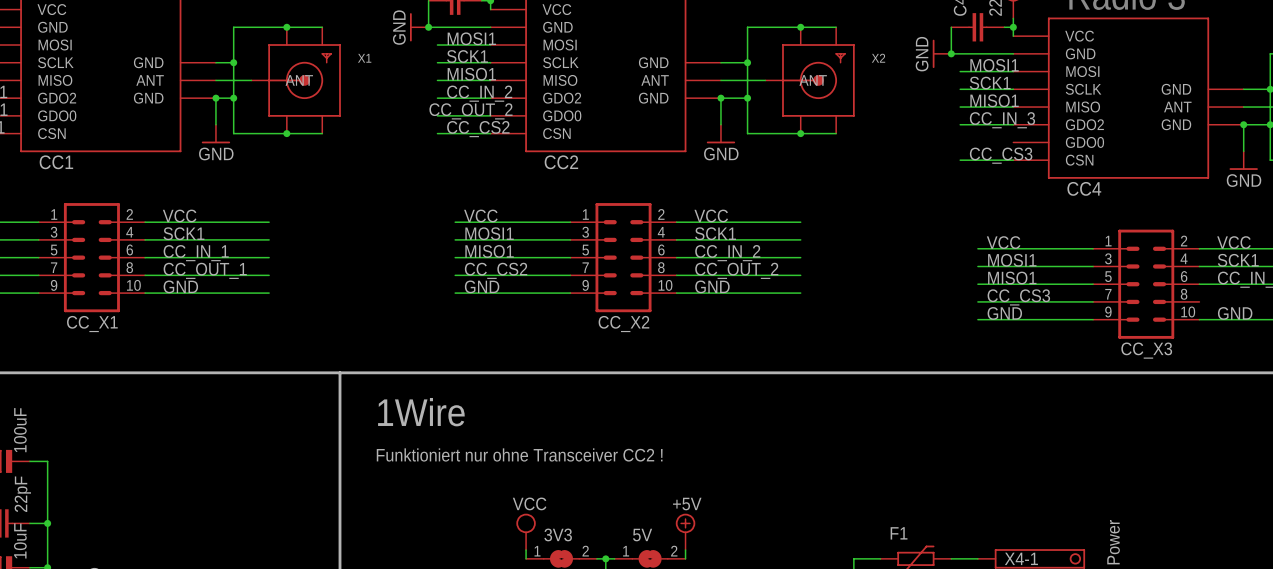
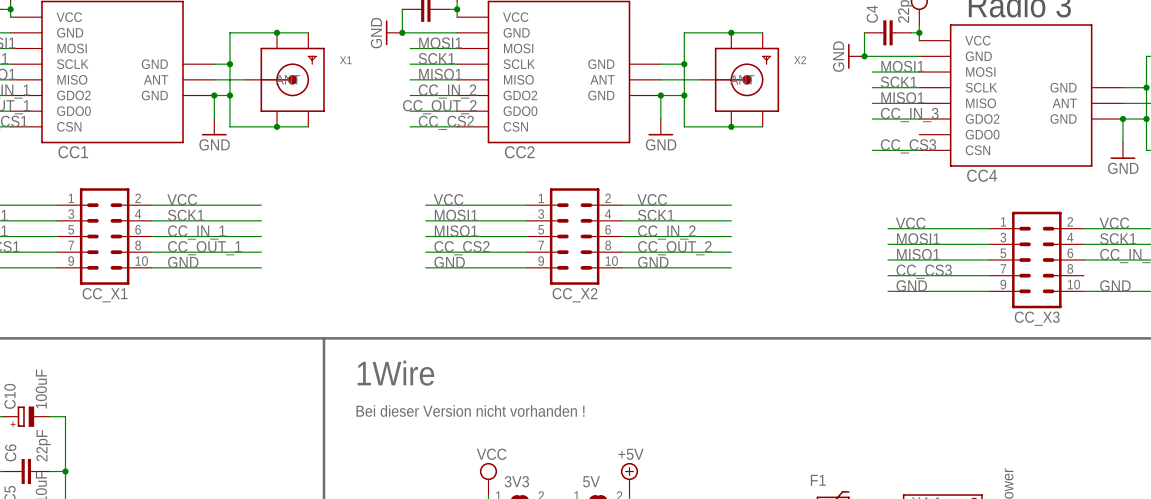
text: Funktioniert nur ohne Transceiver CC2 ! (519, 454) -> Bei dieser Version nicht vorhanden ! (470, 410)

